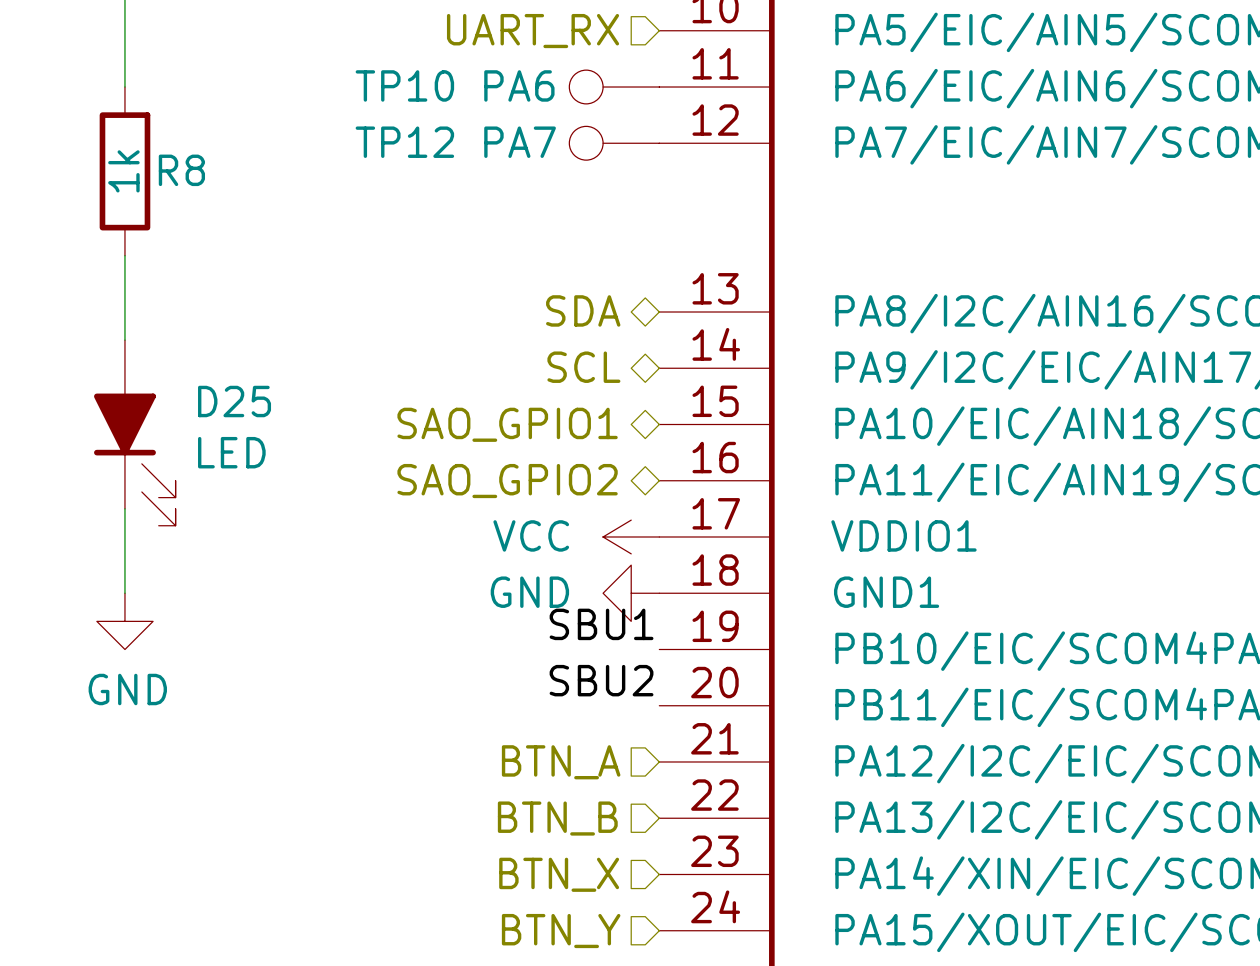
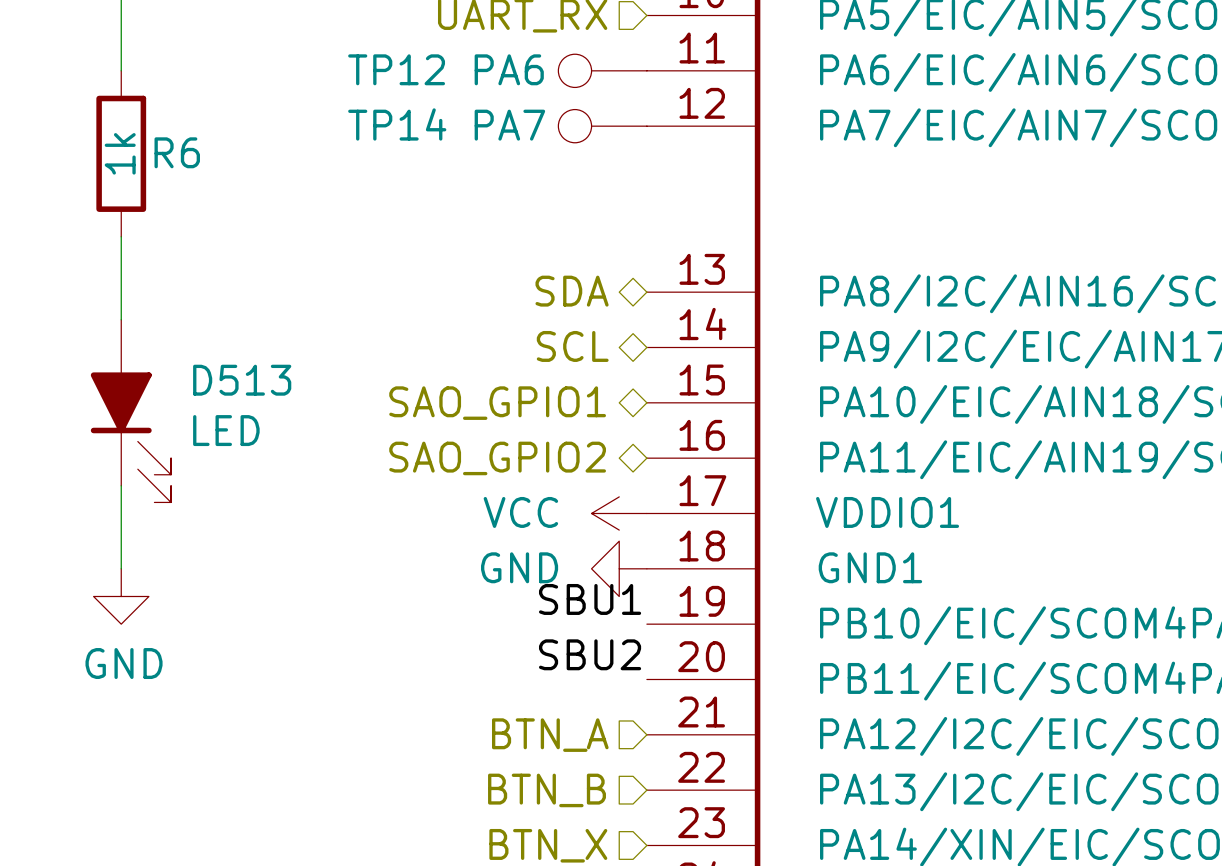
TP10 name: TP10 (404, 85) -> TP12 (396, 69)
TP12 name: TP12 (404, 142) -> TP14 (397, 124)
R8 name: R8 (181, 170) -> R6 (177, 152)
D25 name: D25 (234, 401) -> D513 (242, 380)

